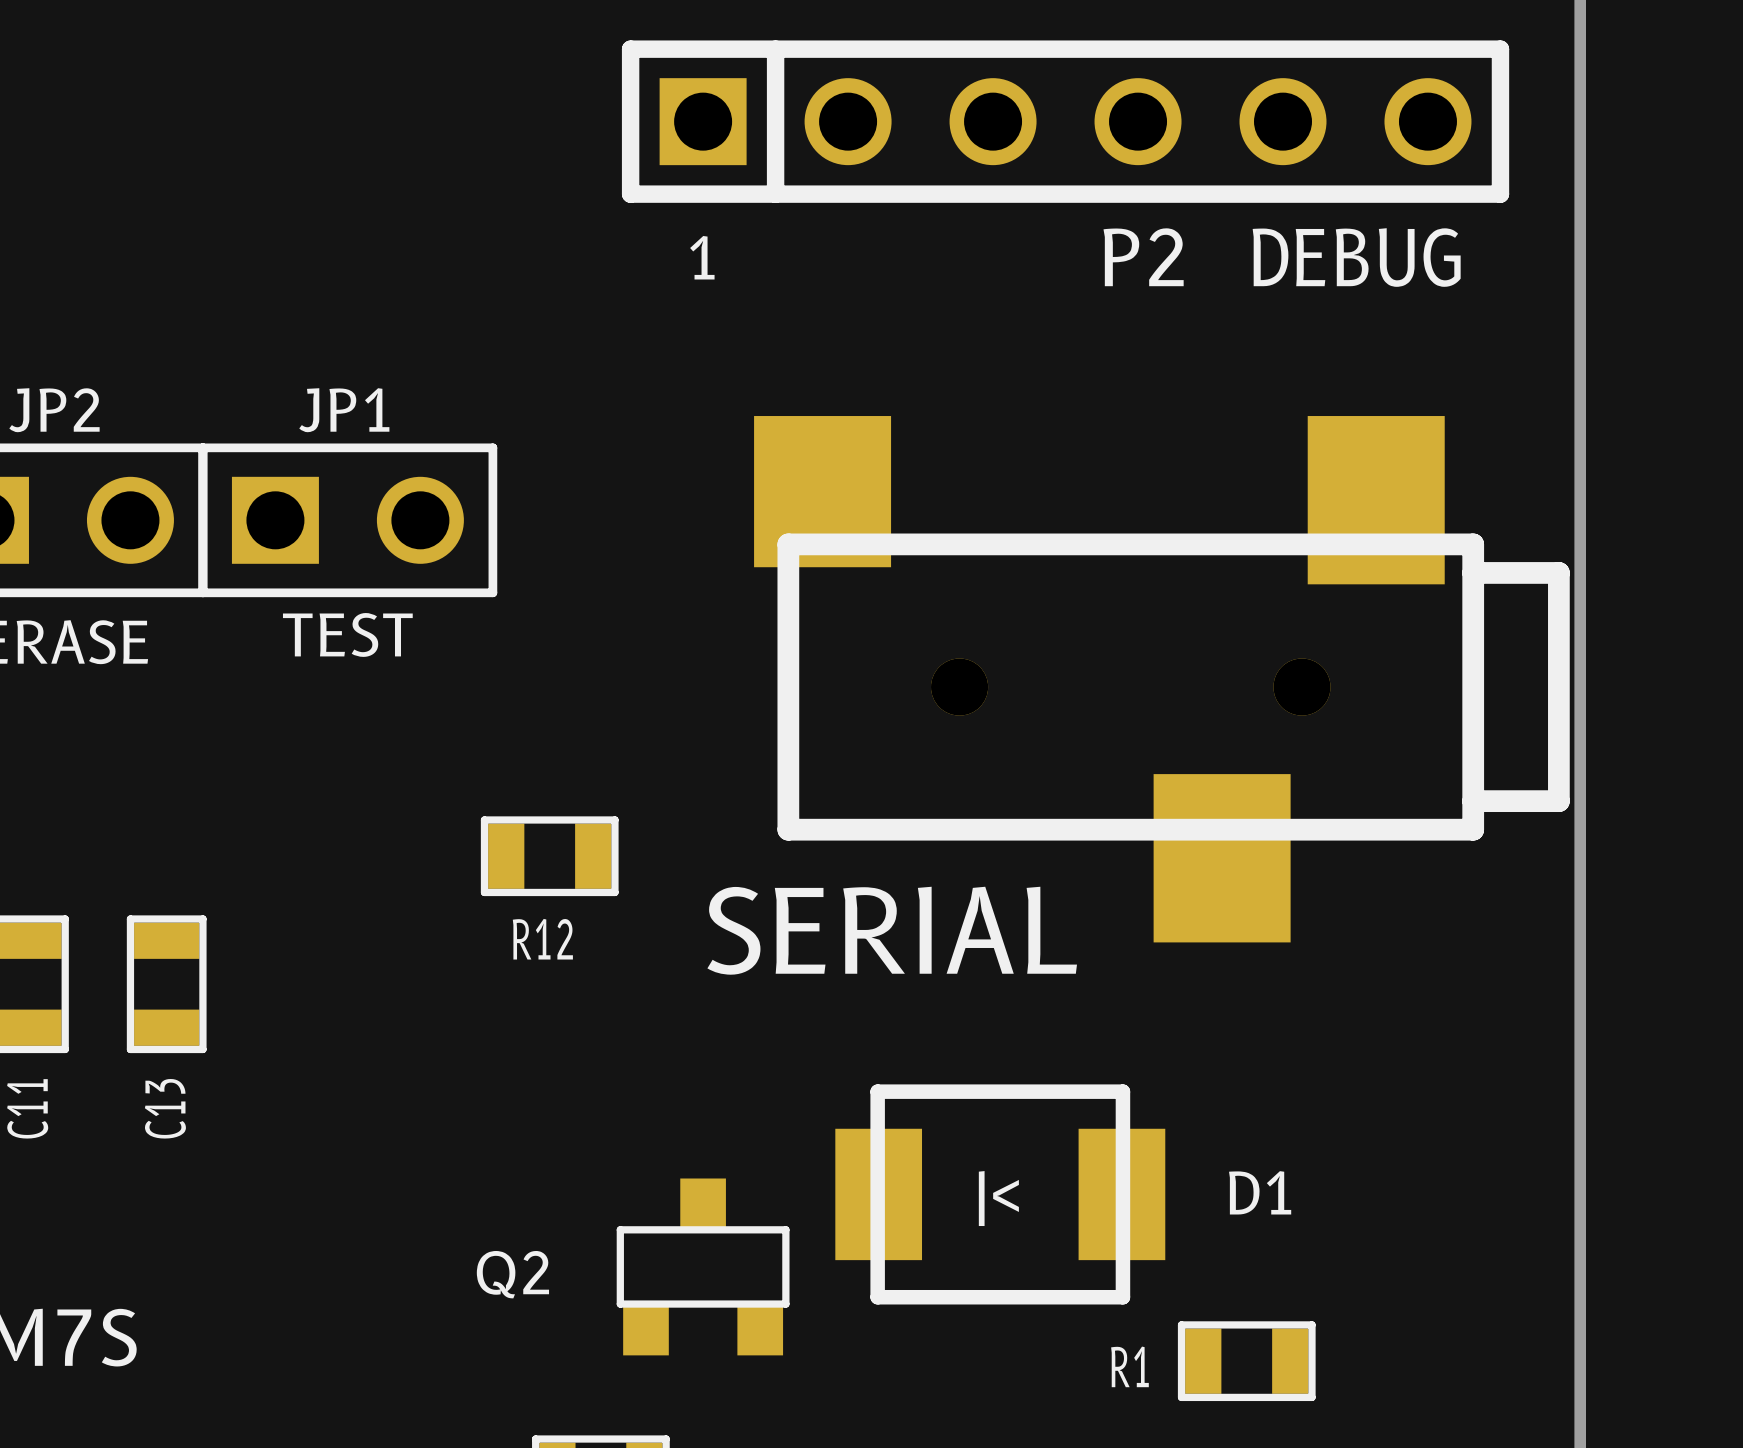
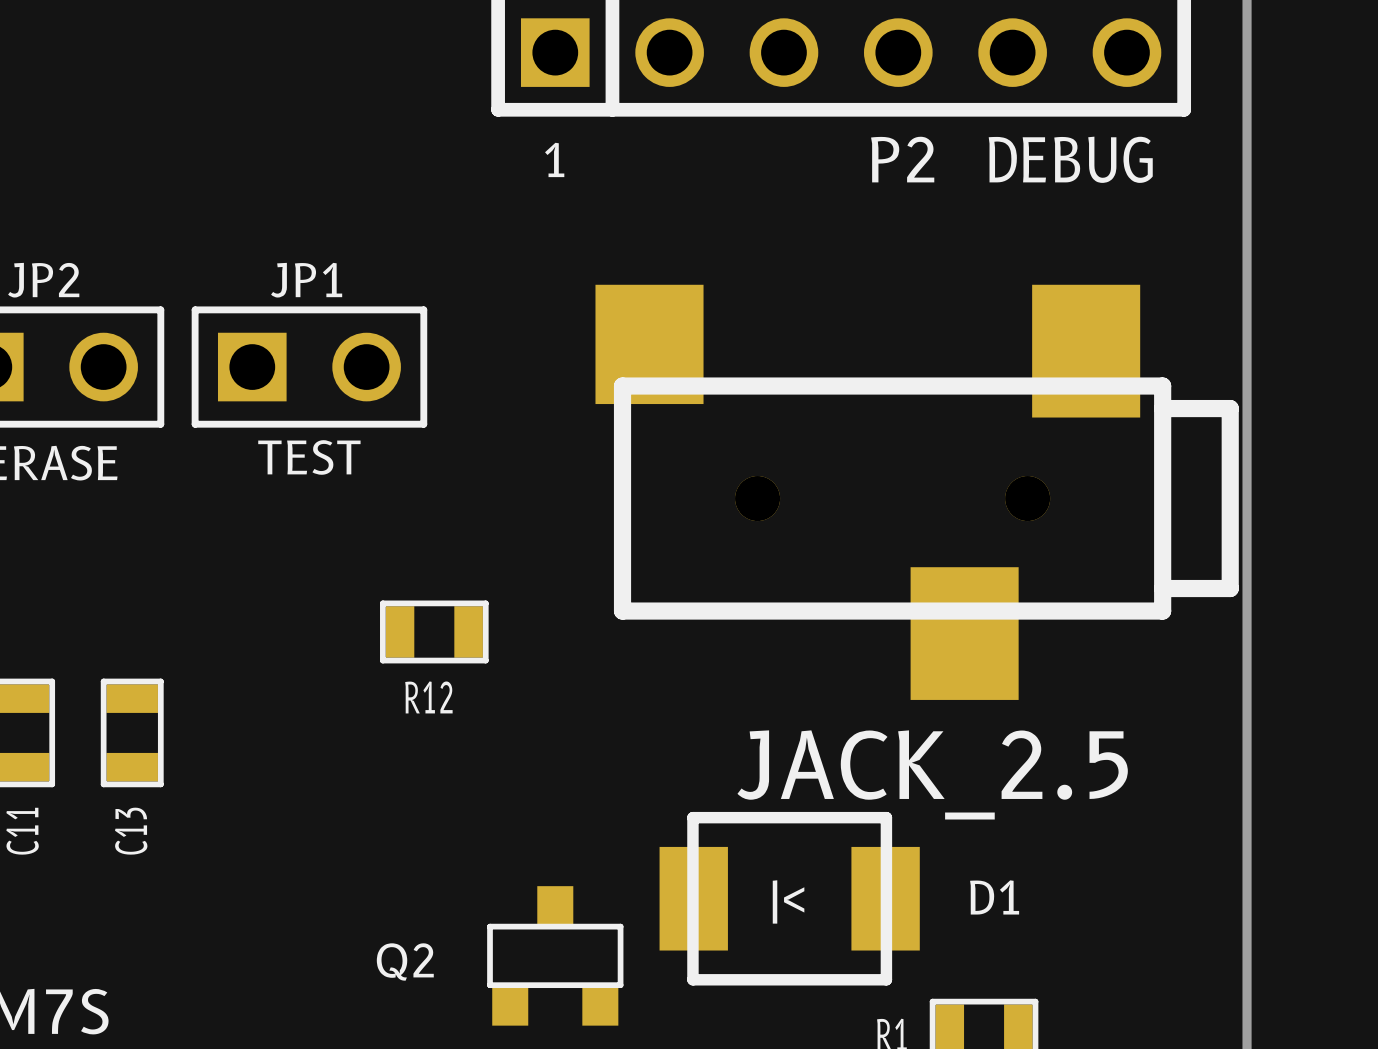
JP1 position: (347, 520) -> (309, 367)
part value: SERIAL (892, 930) -> JACK_2.5 (932, 774)

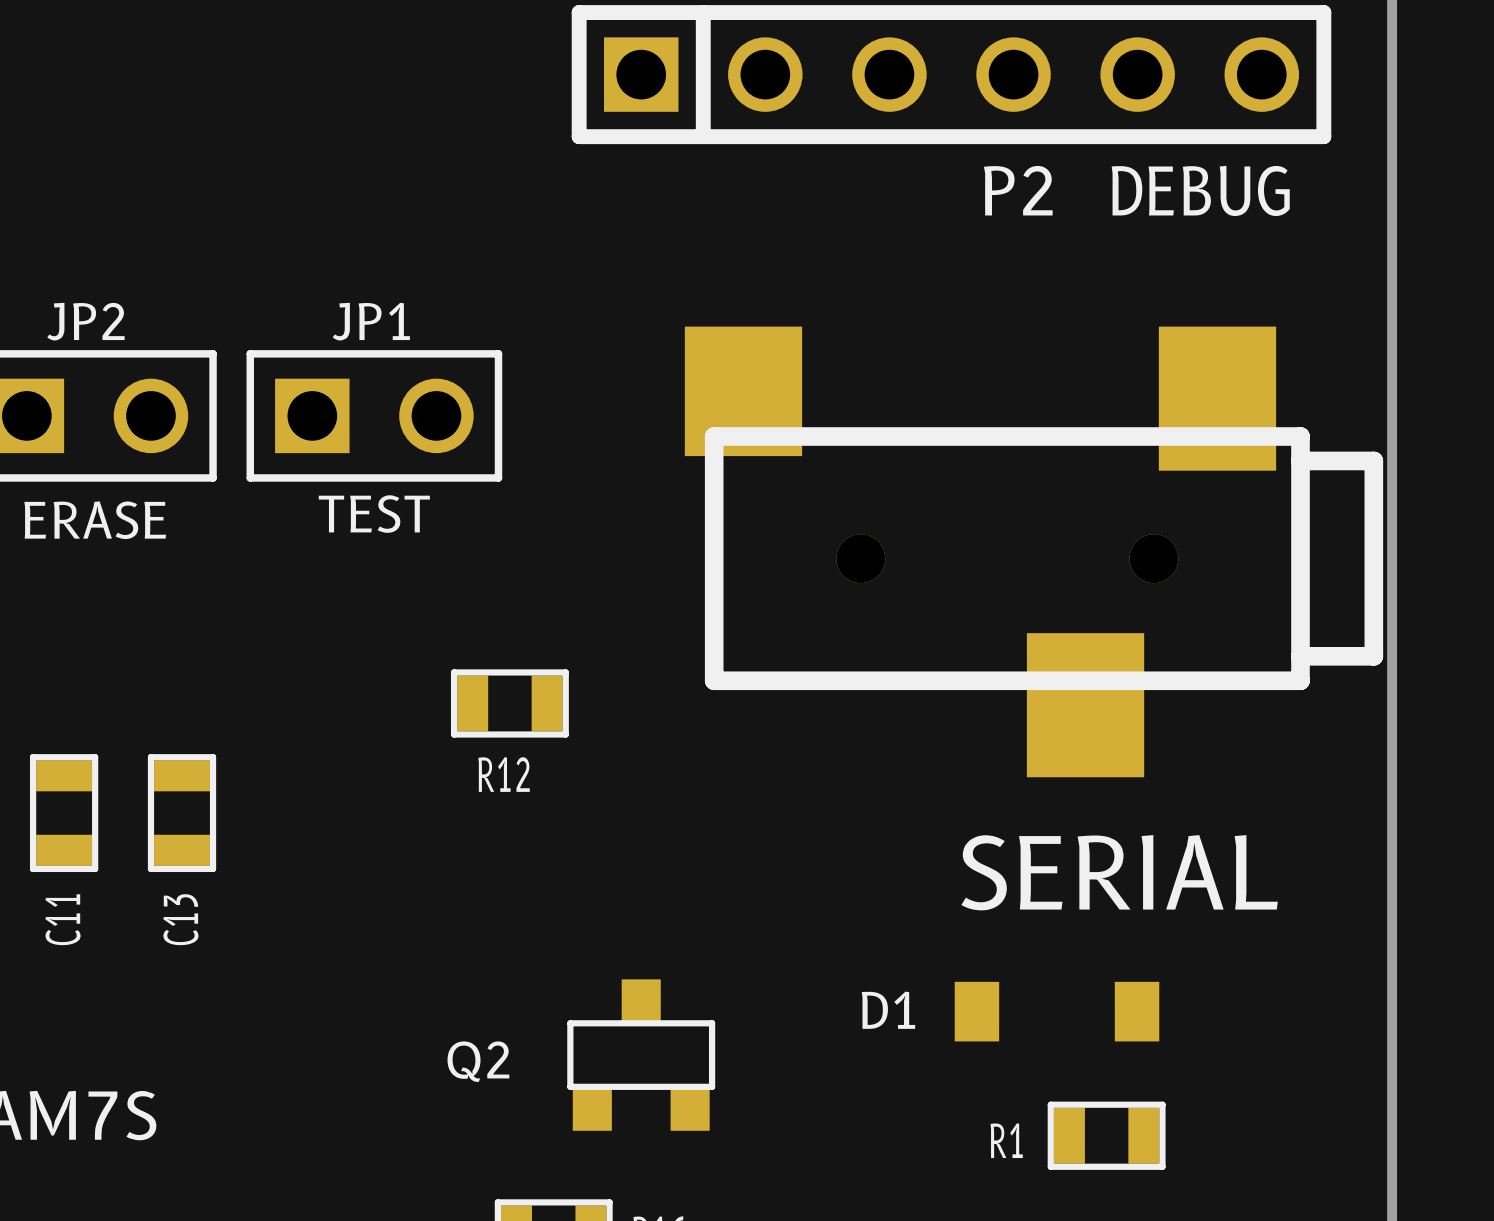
text: 1 (554, 159) -> none
part value: JACK_2.5 (932, 774) -> SERIAL (1119, 872)
D1 footprint: [659, 811, 920, 986] -> [954, 981, 1160, 1042]
D1 name position: D1 (994, 897) -> D1 (888, 1010)
text: |< (788, 901) -> none

